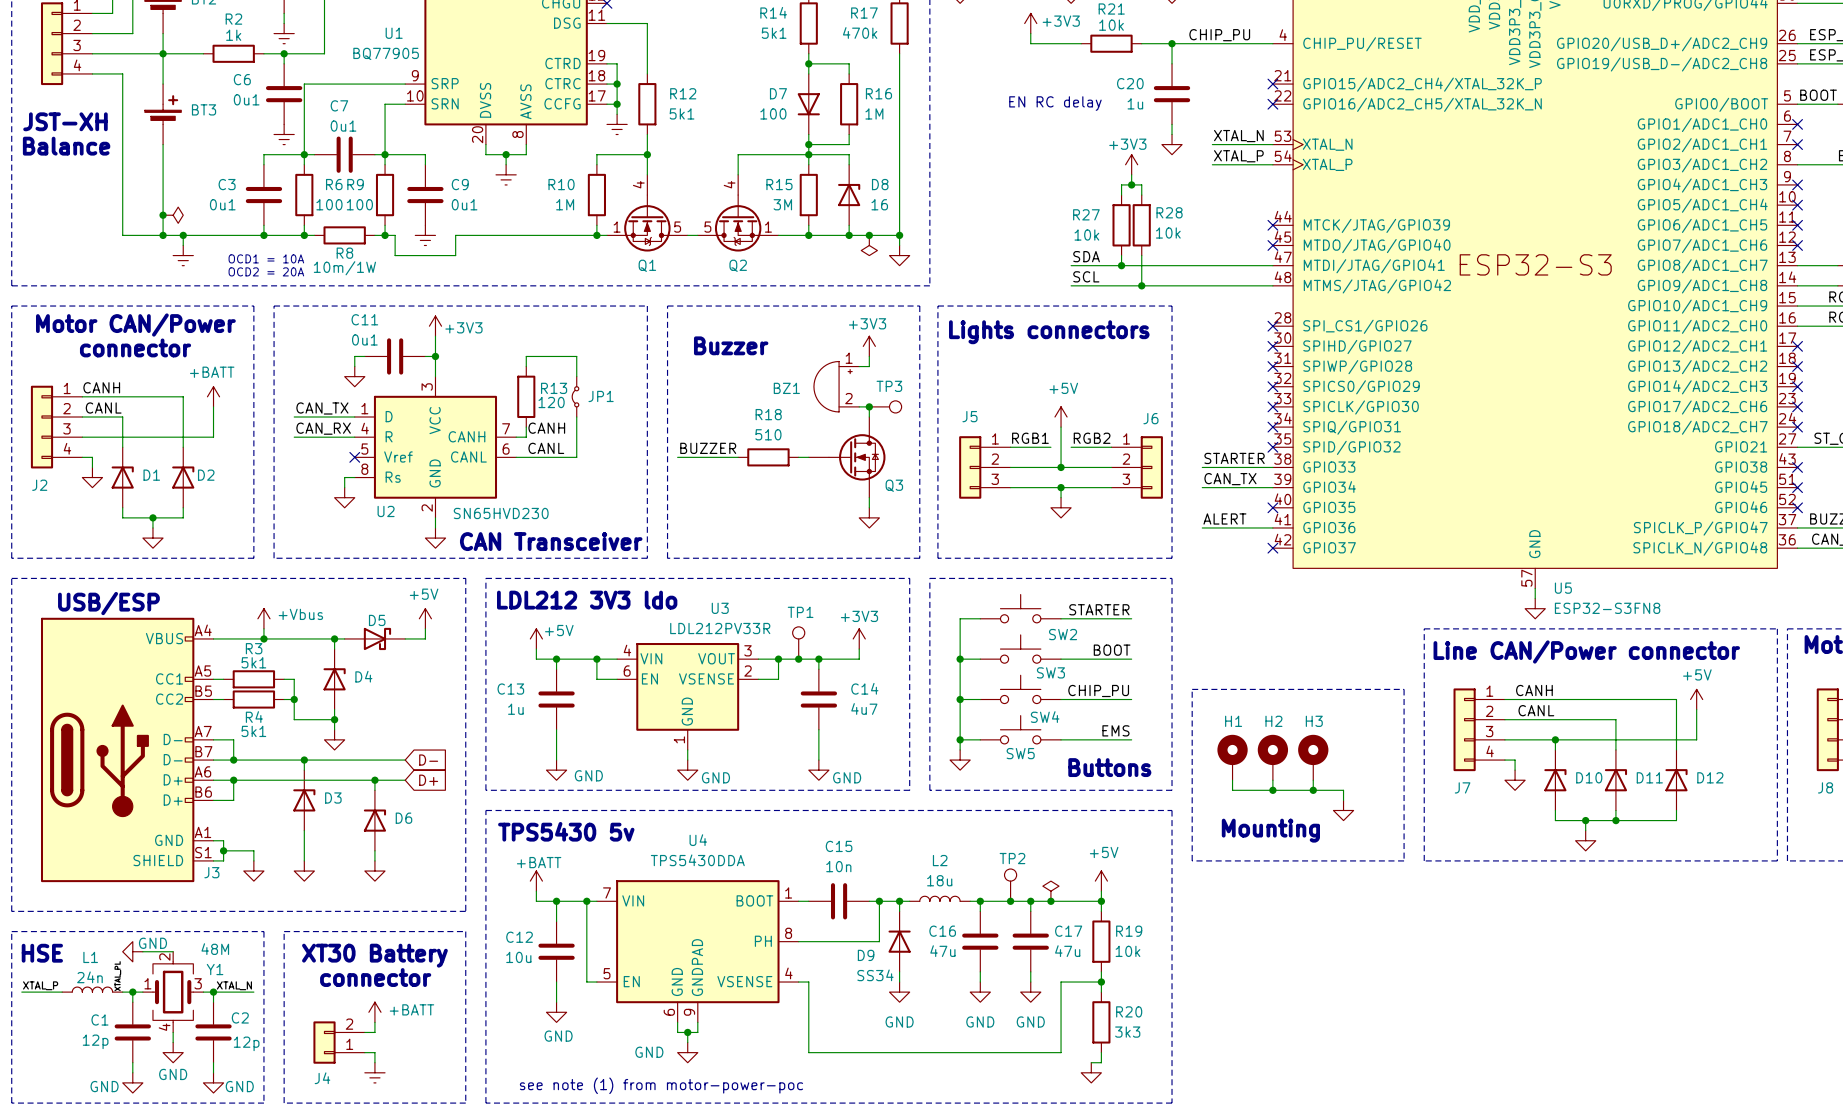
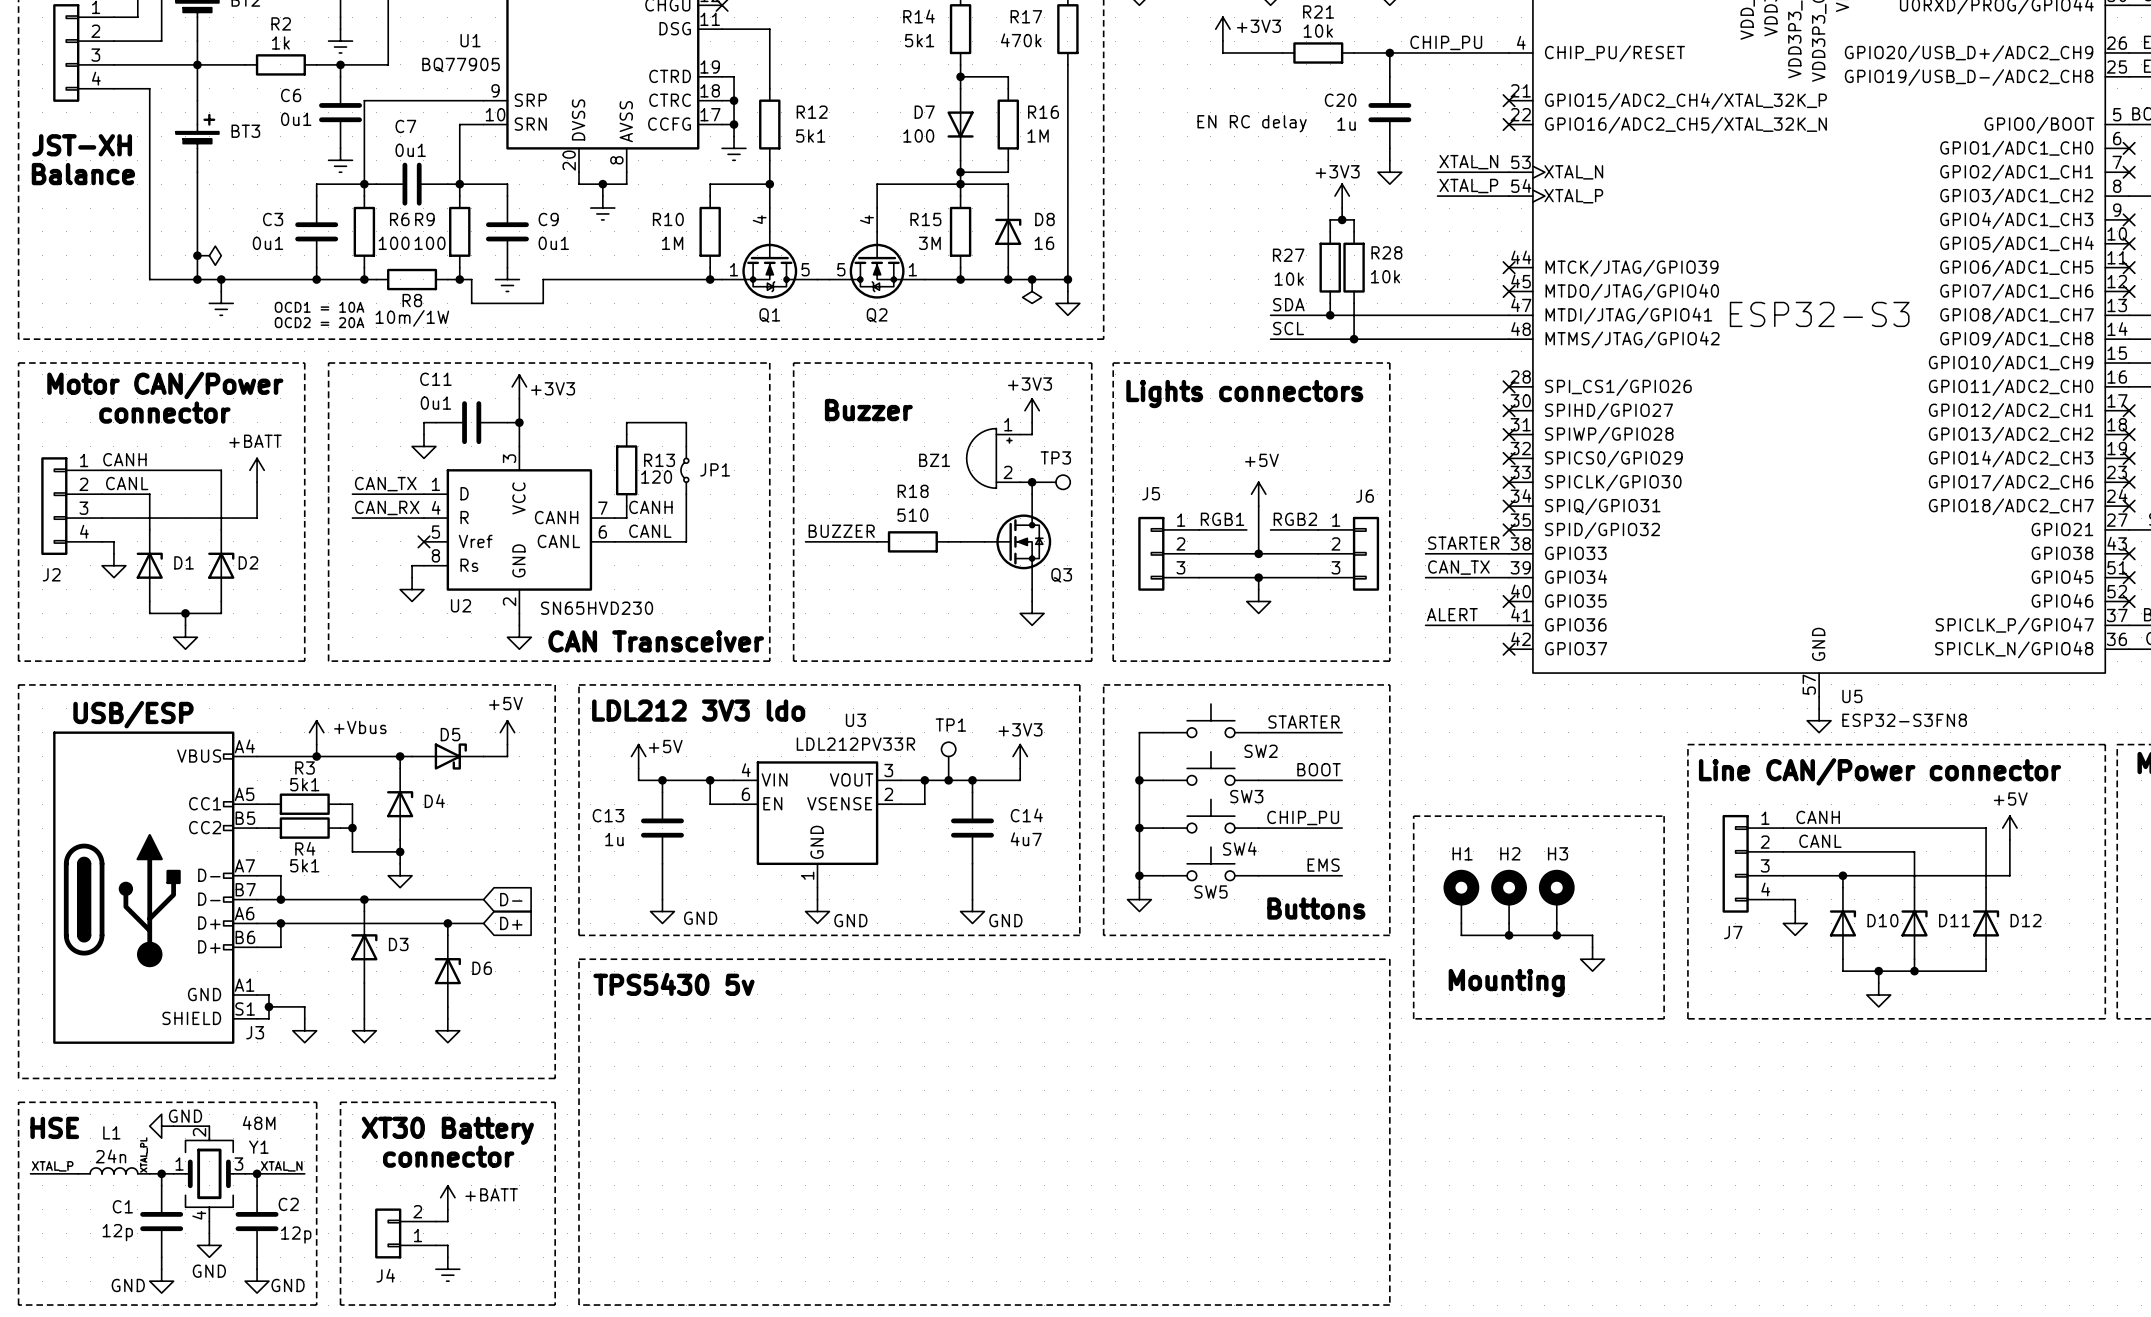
power symbol: +BATT (536, 881) -> none
power symbol: +5V (1101, 881) -> none
TP2: (1010, 885) -> none
wire: (536, 891) (536, 901) (596, 901) -> none
power symbol: (1050, 891) -> none
wire: (1101, 891) (1101, 911) -> none
L2: 18u (939, 898) -> none
wire: (556, 901) (556, 921) -> none
junction: (556, 901) -> none
wire: (586, 901) (586, 982) (596, 982) -> none
junction: (586, 901) -> none
wire: (798, 901) (808, 901) -> none
C15: 10n (839, 901) -> none
wire: (869, 901) (909, 901) -> none
wire: (879, 901) (879, 941) (798, 941) -> none
junction: (879, 901) -> none
wire: (899, 901) (899, 911) -> none
junction: (899, 901) -> none
wire: (970, 901) (1101, 901) -> none
wire: (980, 901) (980, 911) -> none
junction: (980, 901) -> none
junction: (1010, 901) -> none
wire: (1030, 901) (1030, 911) -> none
junction: (1030, 901) -> none
junction: (1050, 901) -> none
junction: (1101, 901) -> none
D9: SS34 (899, 941) -> none
C16: 47u (980, 941) -> none
C17: 47u (1030, 941) -> none
R19: 10k (1101, 941) -> none
C12: 10u (556, 951) -> none
U4: TPS5430DDA (697, 951) -> none
wire: (899, 971) (899, 982) -> none
wire: (980, 971) (980, 982) -> none
wire: (1030, 971) (1030, 982) -> none
wire: (1101, 971) (1101, 992) -> none
wire: (556, 982) (556, 1002) -> none
wire: (798, 982) (808, 982) (808, 1052) (1061, 1052) (1061, 982) (1101, 982) -> none
junction: (1101, 982) -> none
power symbol: GND (899, 992) -> none
power symbol: GND (980, 992) -> none
power symbol: GND (1030, 992) -> none
power symbol: GND (556, 1012) -> none
wire: (677, 1022) (677, 1032) (697, 1032) (697, 1022) -> none
R20: 3k3 (1101, 1022) -> none
wire: (687, 1032) (687, 1042) -> none
junction: (687, 1032) -> none
power symbol: GND (687, 1052) -> none
wire: (1101, 1052) (1101, 1062) (1091, 1062) -> none
power symbol: (1091, 1072) -> none
text: see note (1) from motor-power-poc (661, 1085) -> none

